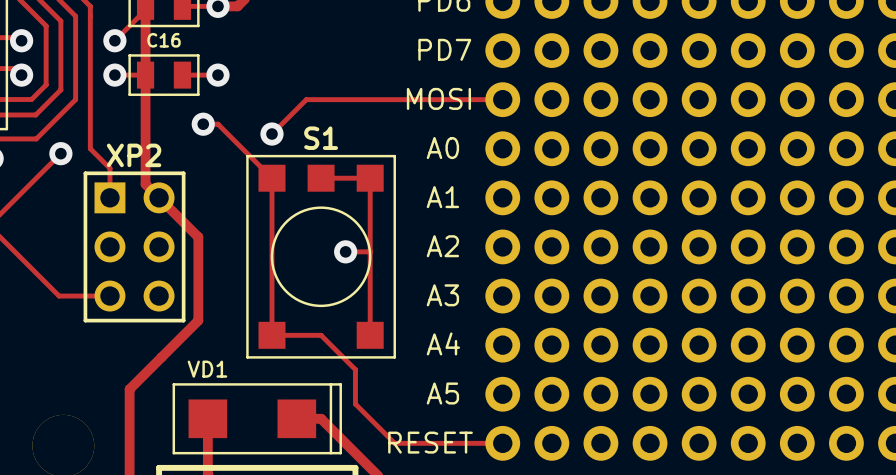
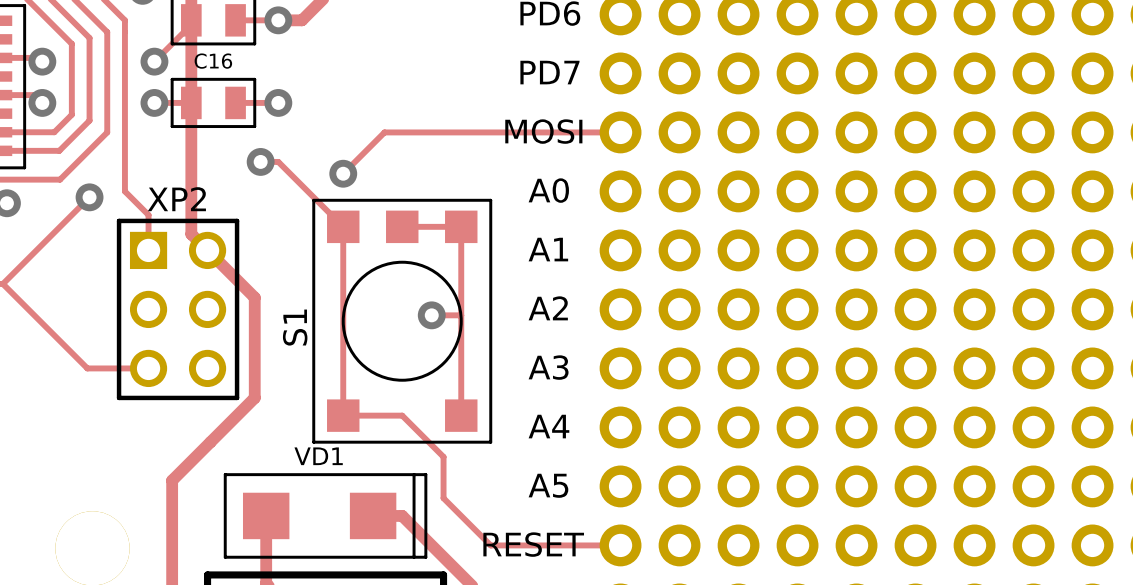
S1 name rotation: 0° (321, 138) -> 90° counterclockwise (295, 327)
S1 name position: S1 (321, 138) -> S1 (295, 327)
VD1 name position: VD1 (207, 369) -> VD1 (318, 456)

